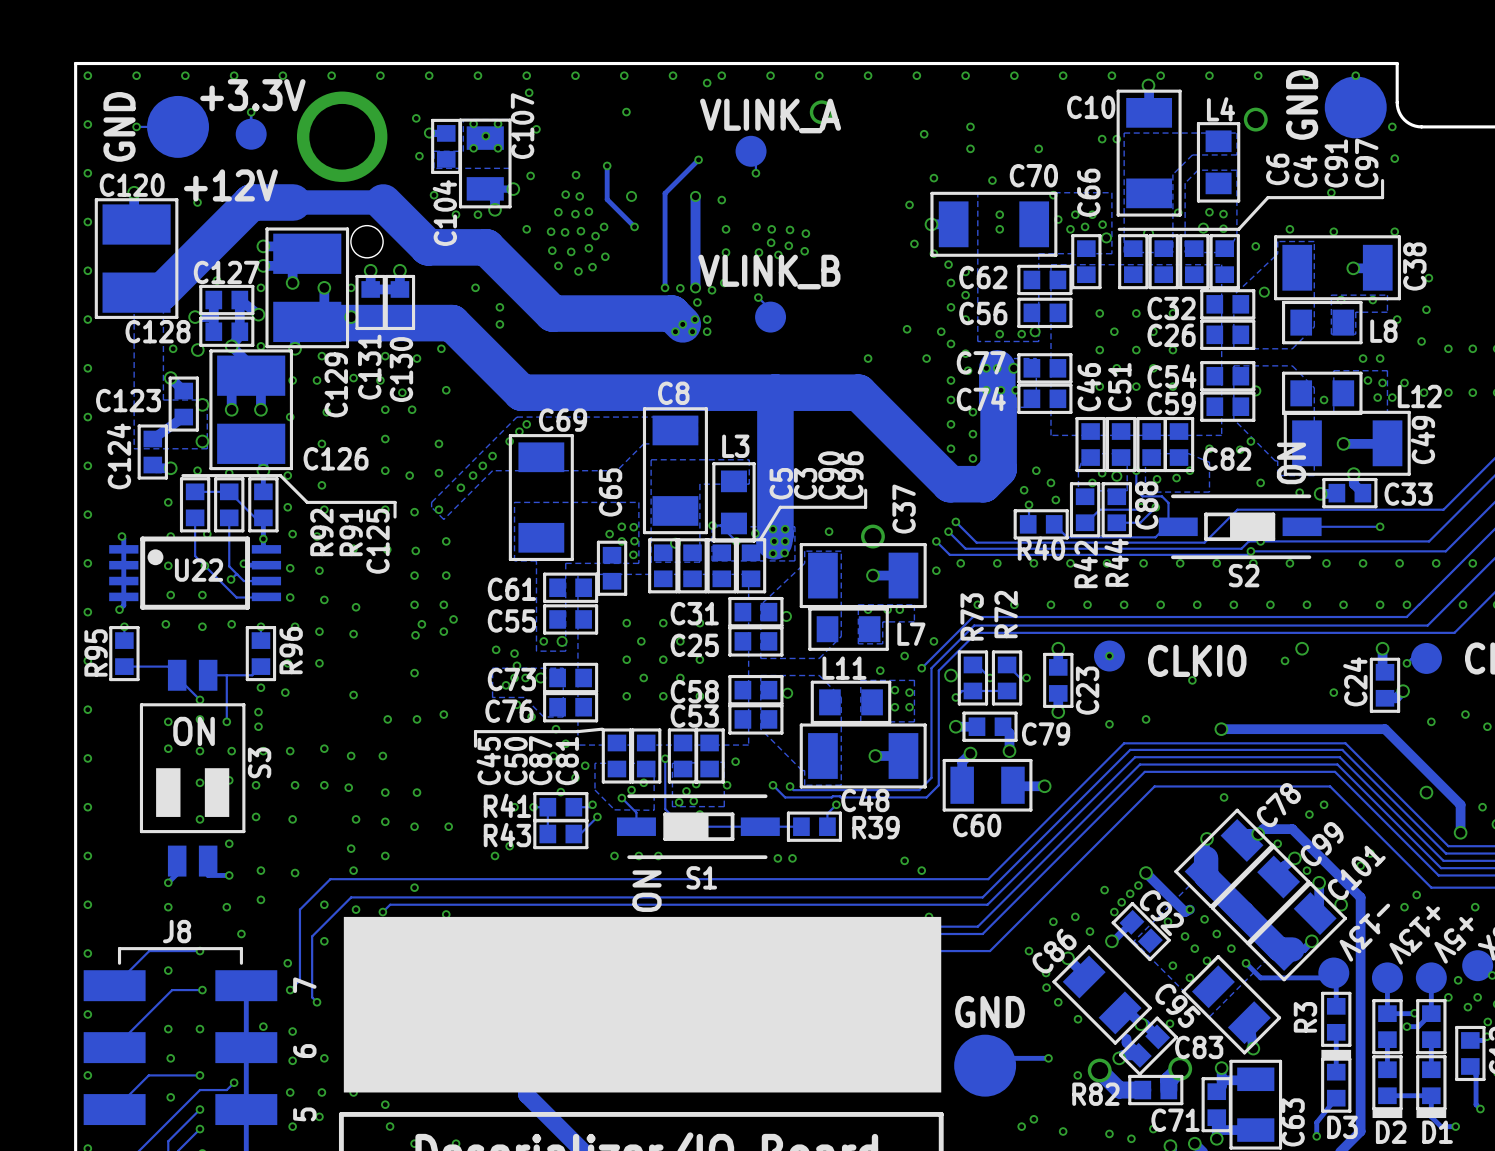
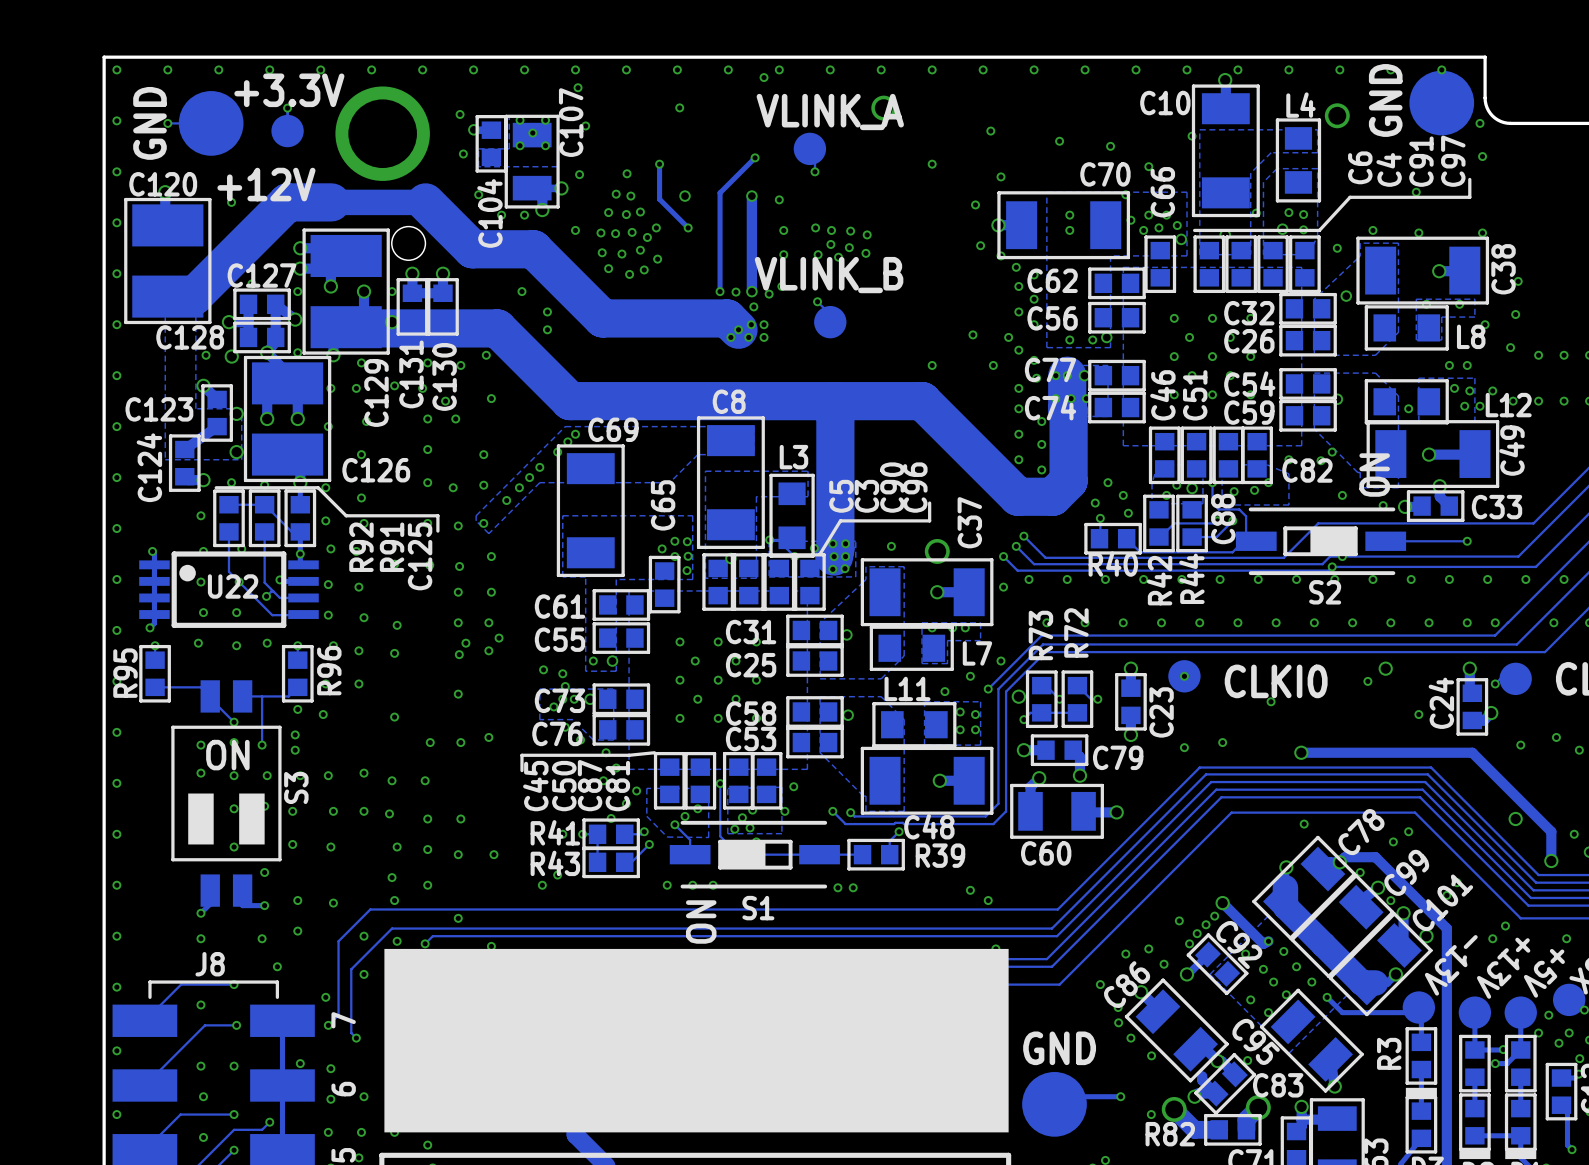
via: (970, 126) -> none
via position: (1102, 139) -> (1148, 166)
via: none -> (1059, 141)
via: (970, 148) -> none
via: none -> (932, 164)
via: (992, 180) -> none

